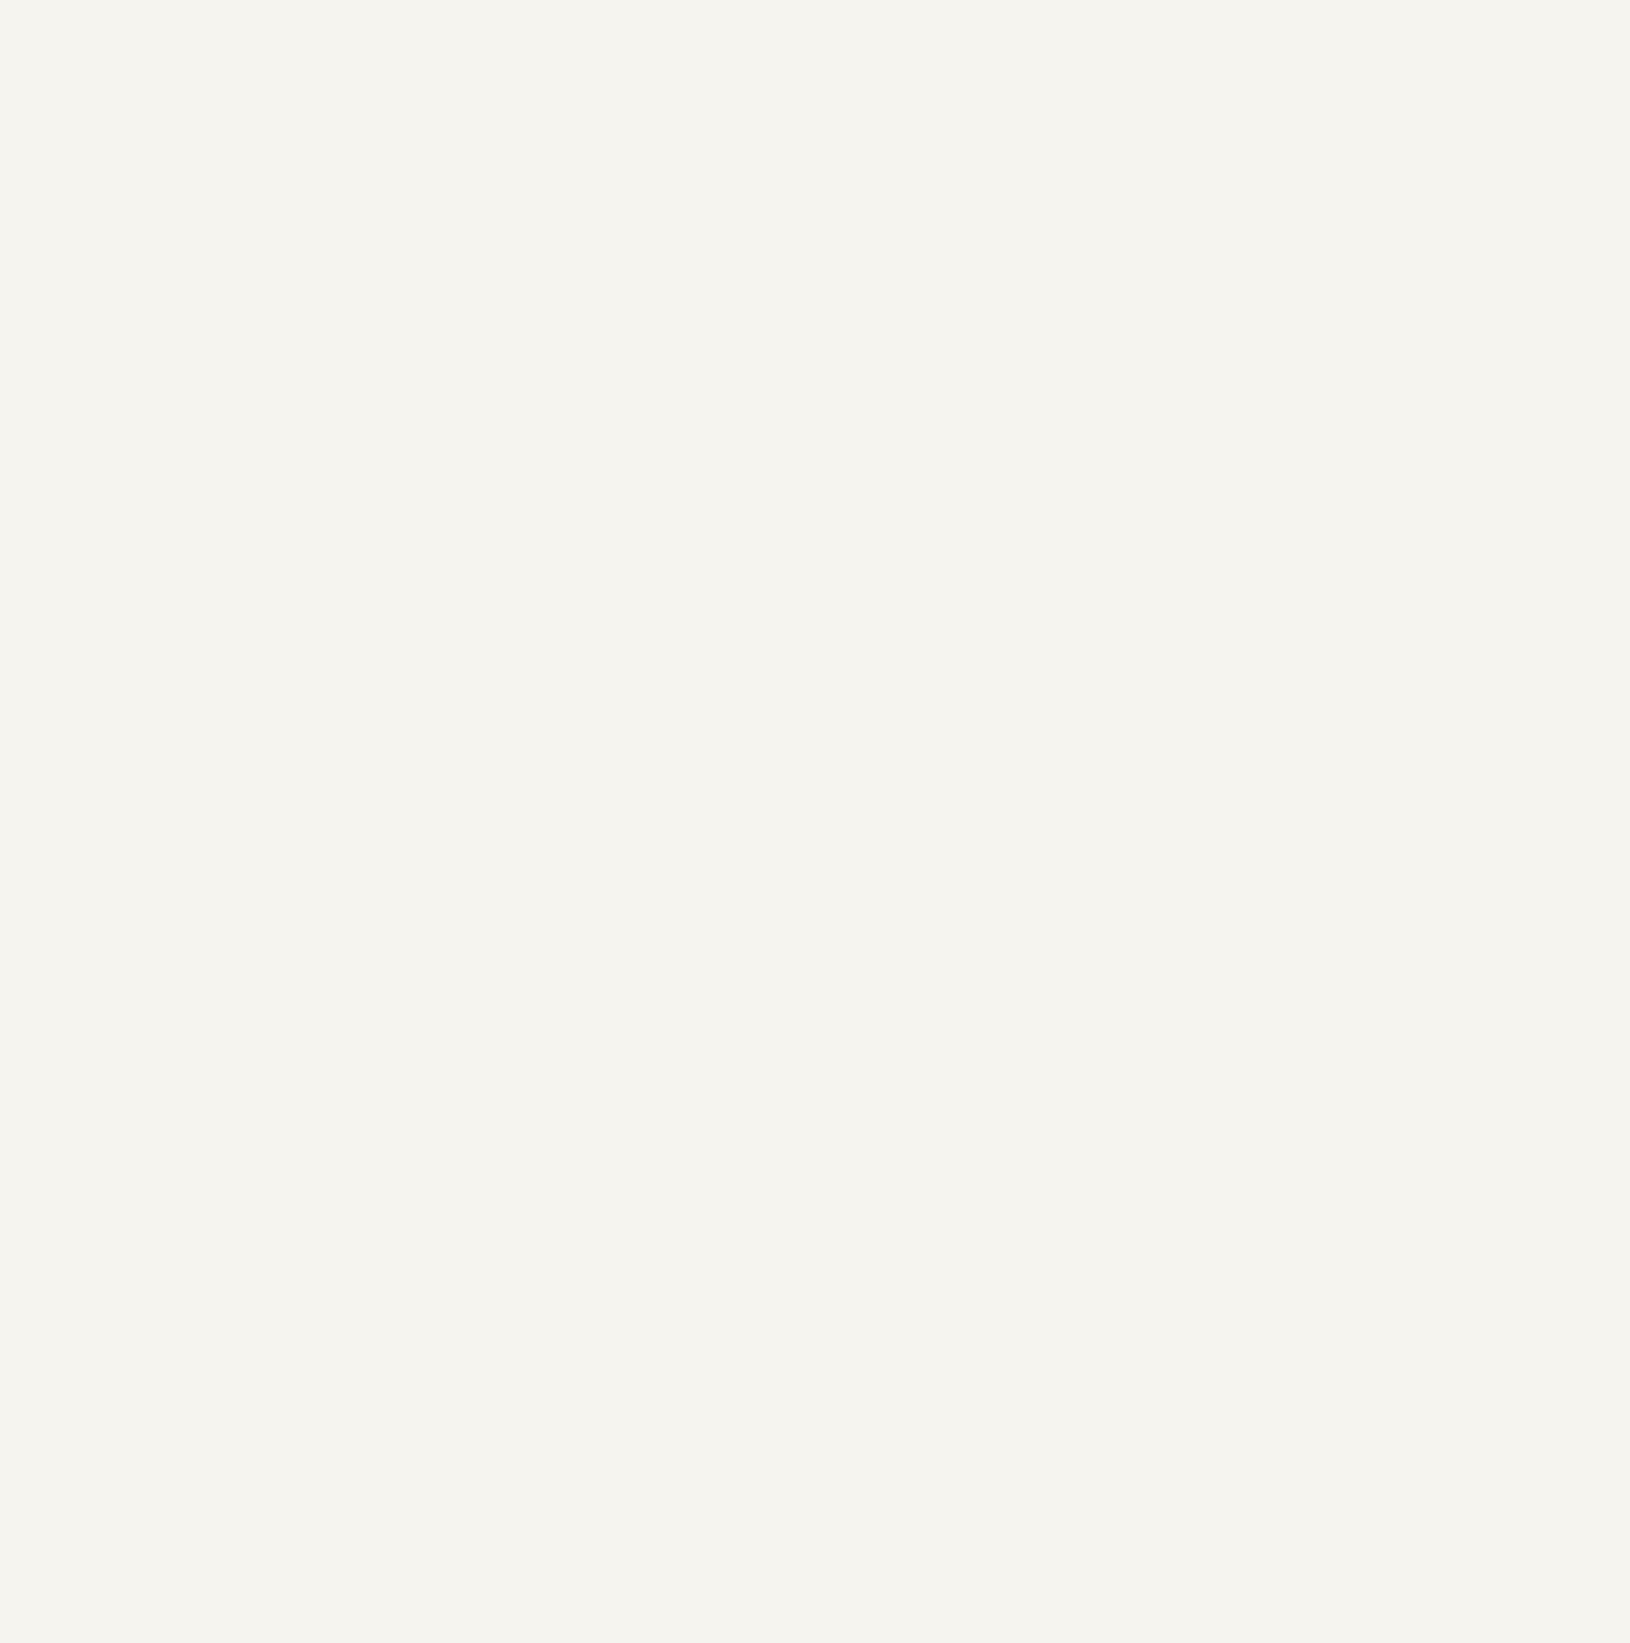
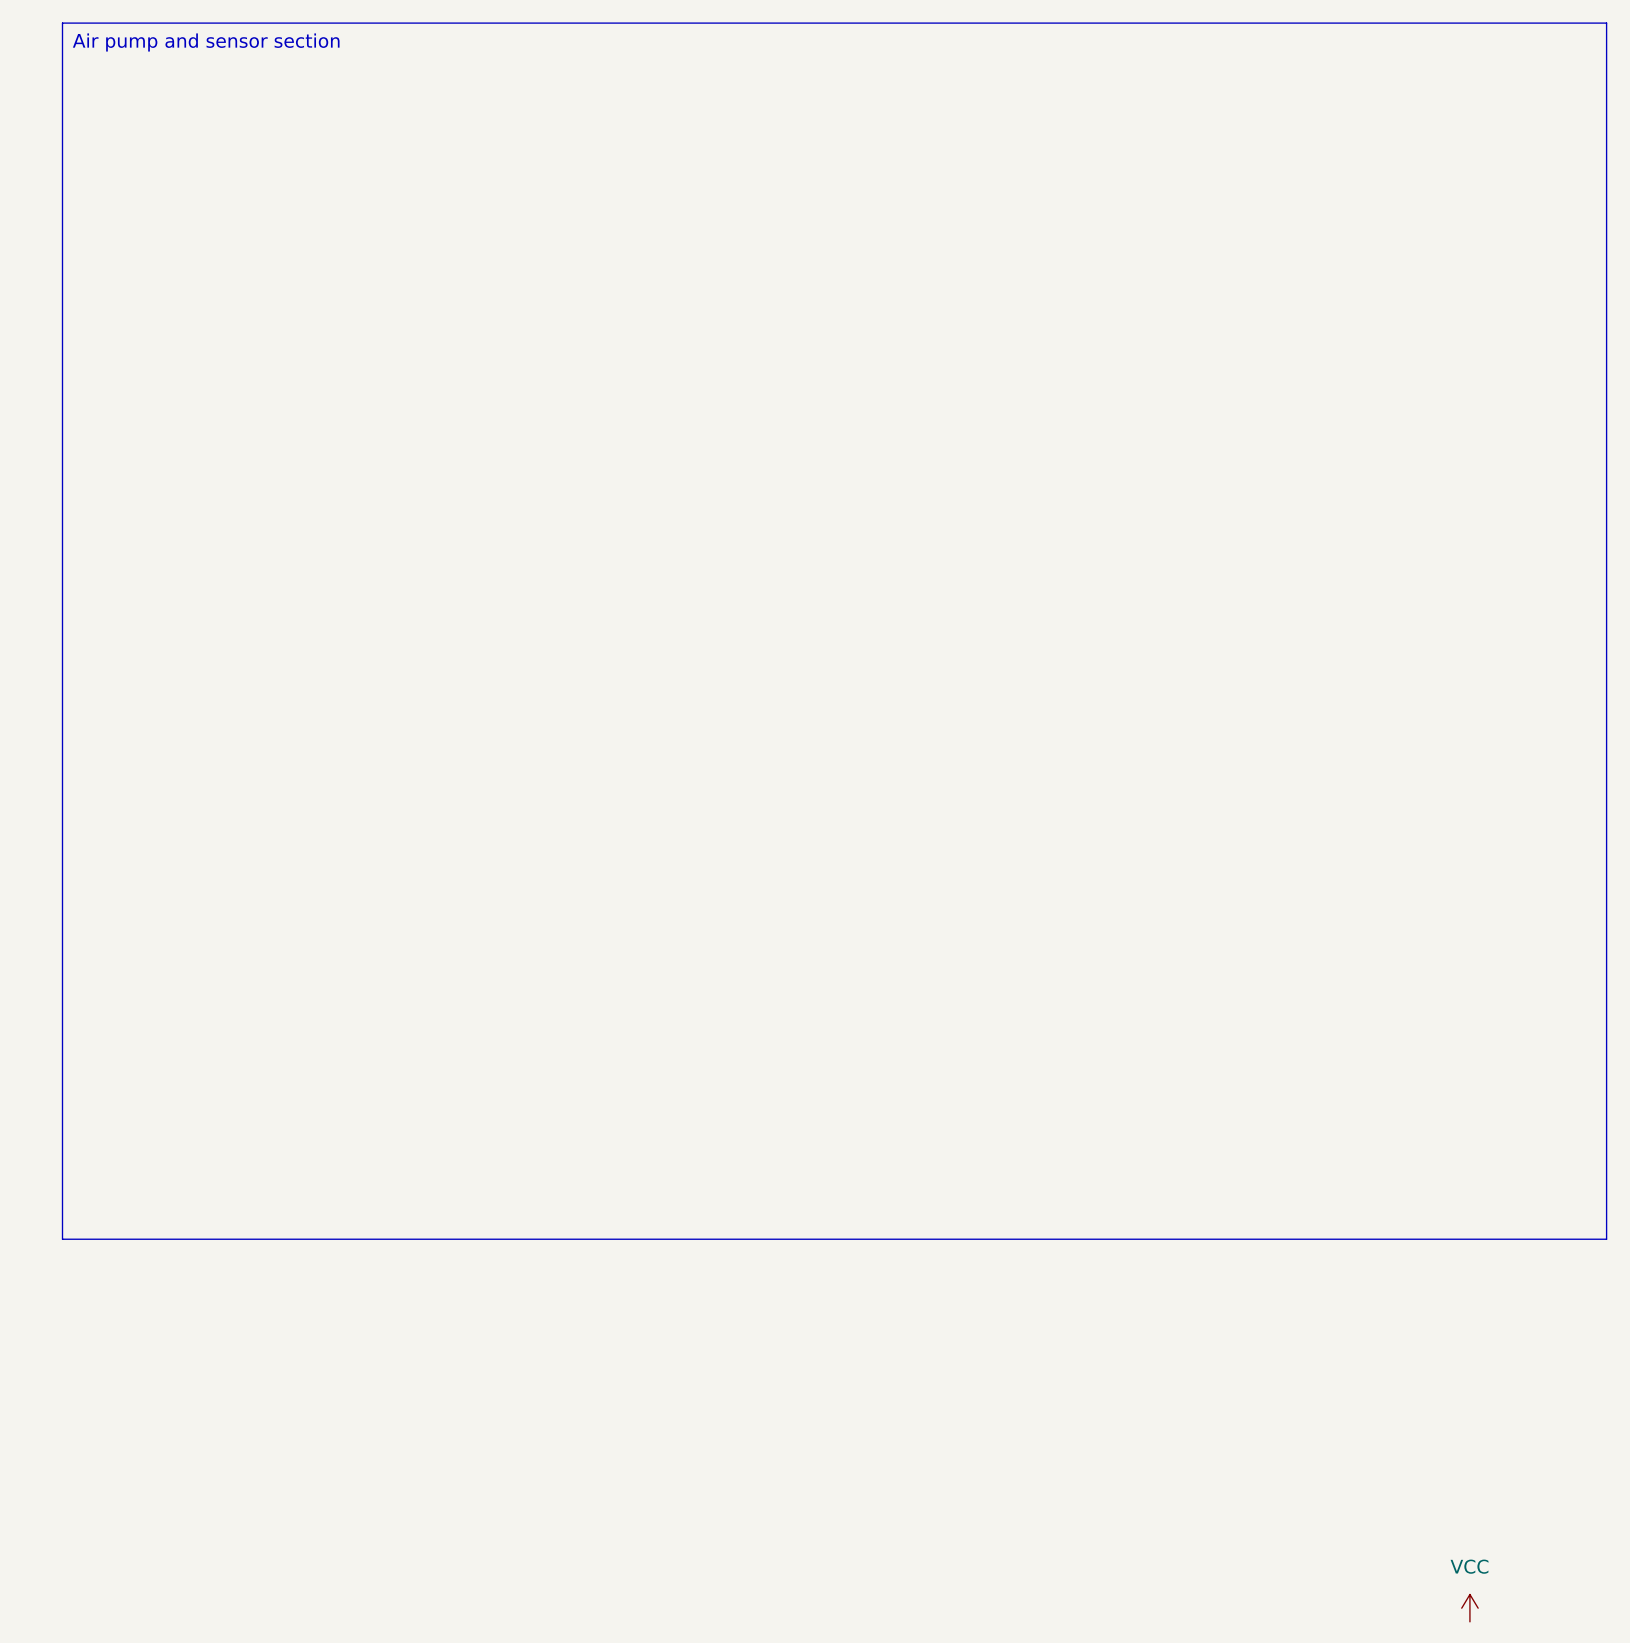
line: none -> (62, 23) (1606, 23) (1606, 1239) (62, 1239) (62, 23)
text: none -> Air pump and sensor section (206, 42)
power symbol: none -> VCC (1469, 1608)

